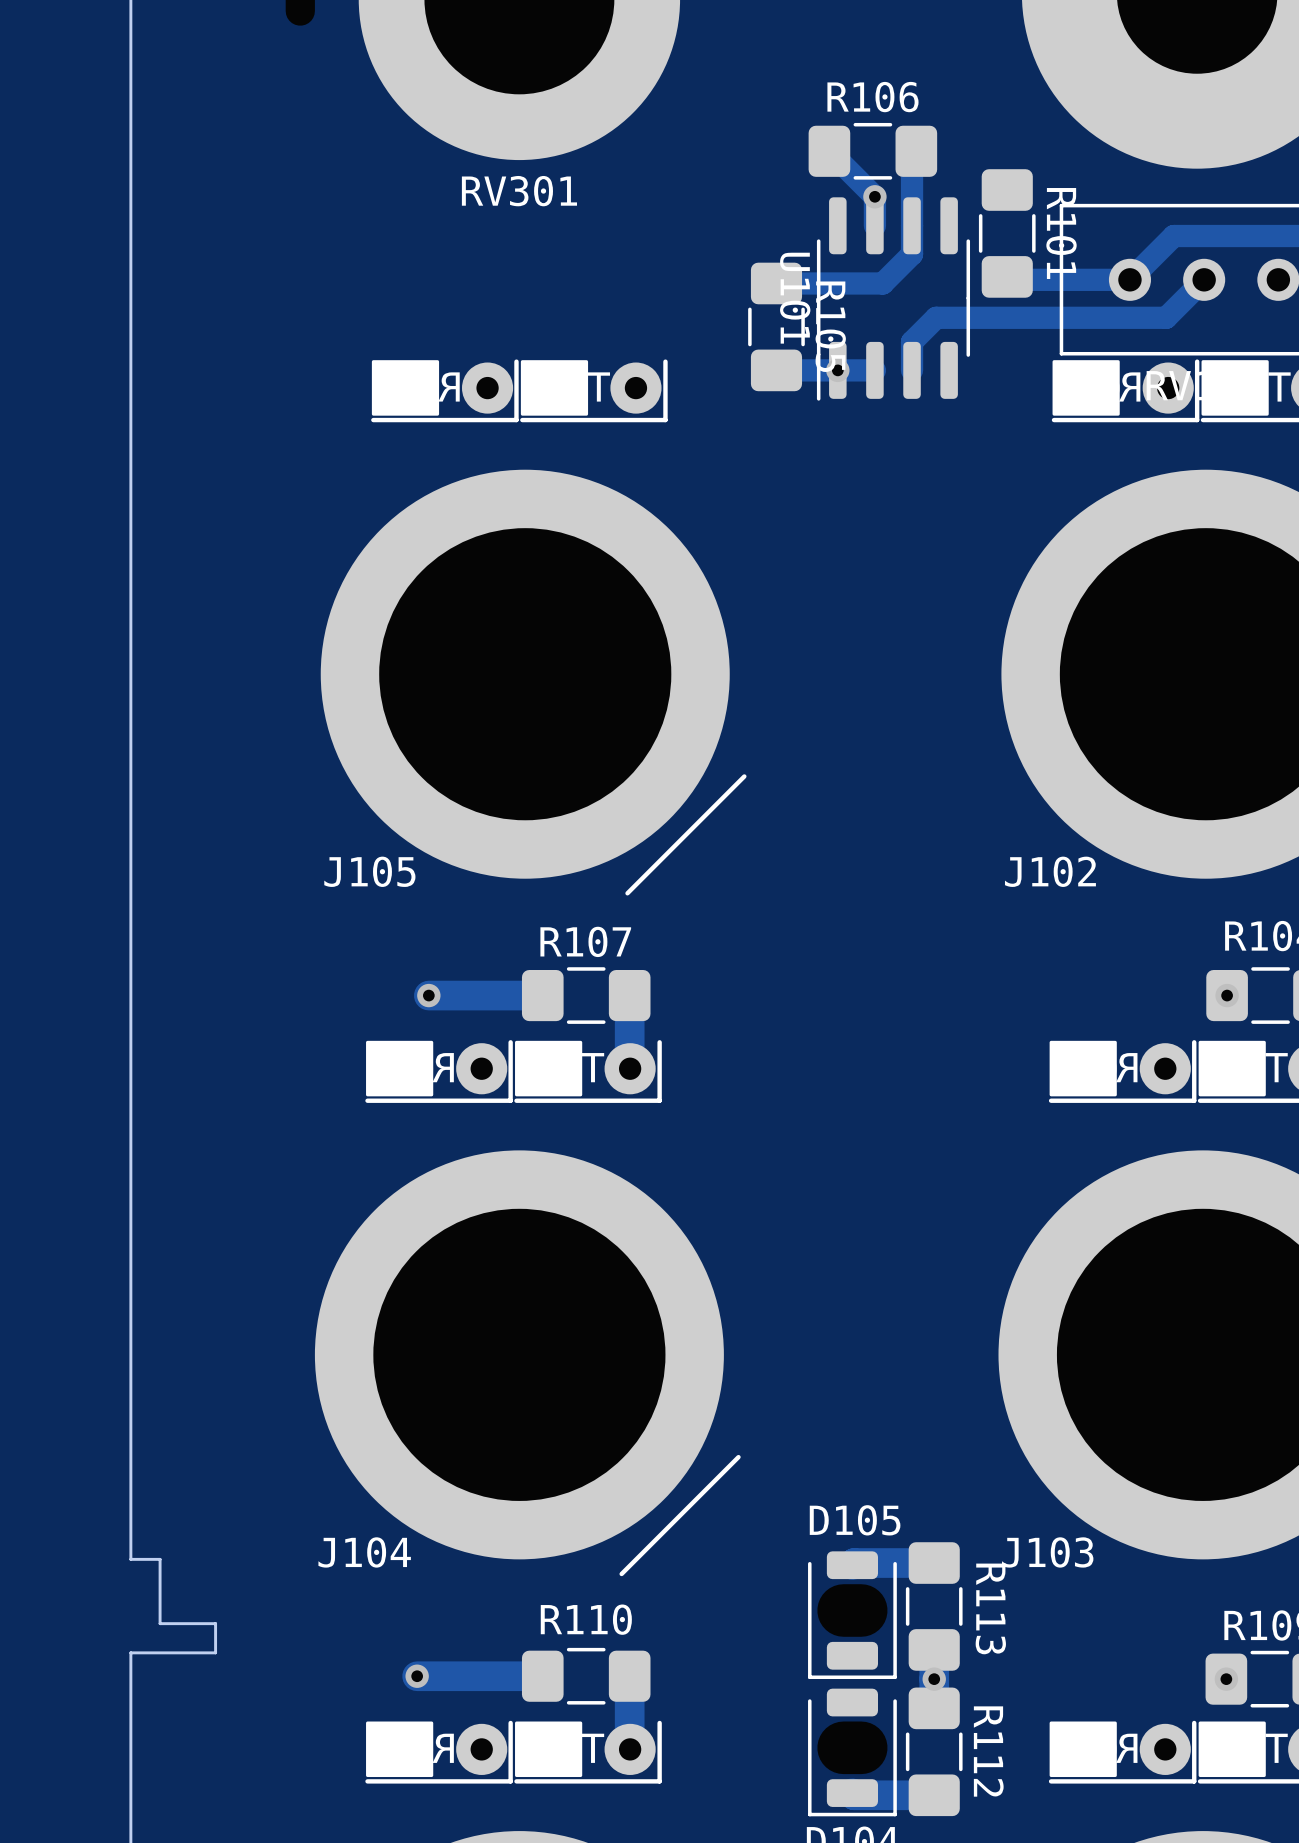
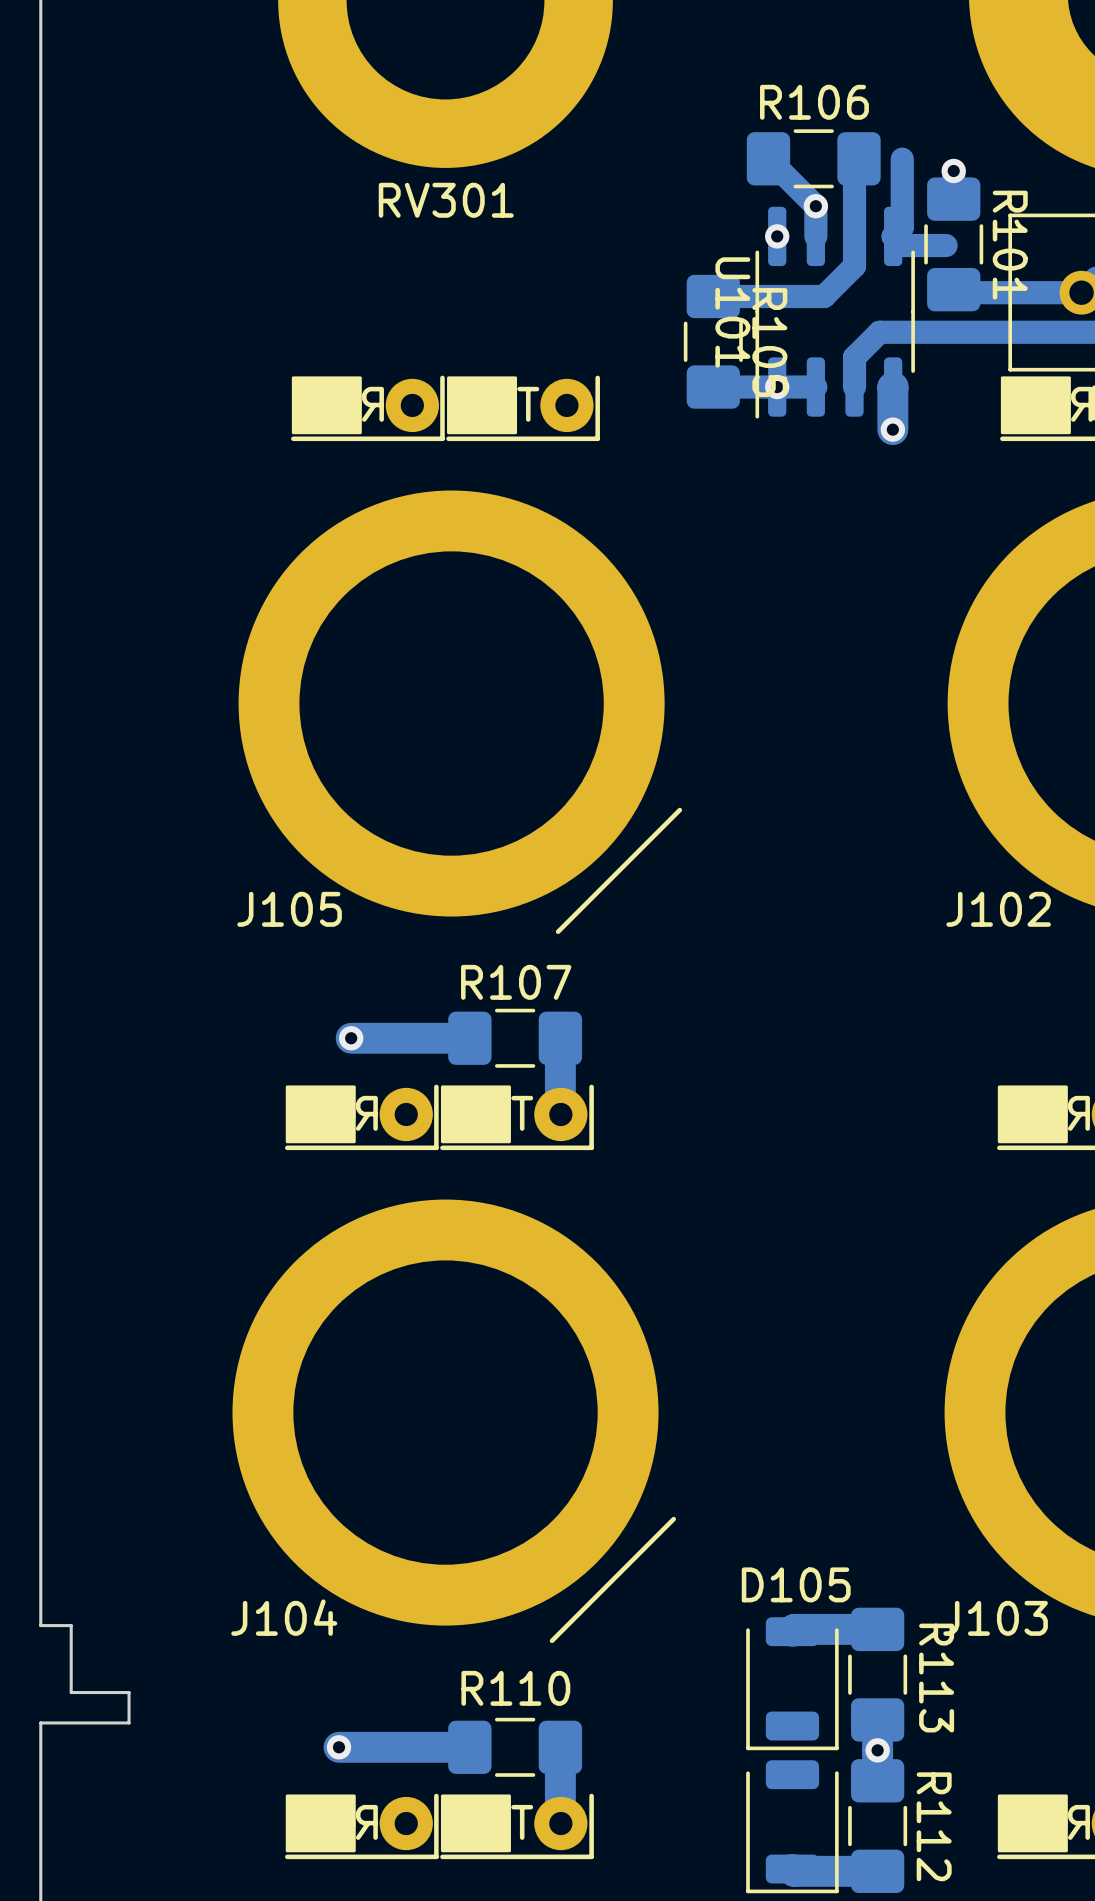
track: none -> (902, 159) (902, 227) (893, 236) (902, 245) (946, 245)
via: none -> (953, 170)
via: none -> (777, 236)
track: none -> (892, 387) (892, 429)
via: none -> (892, 429)

